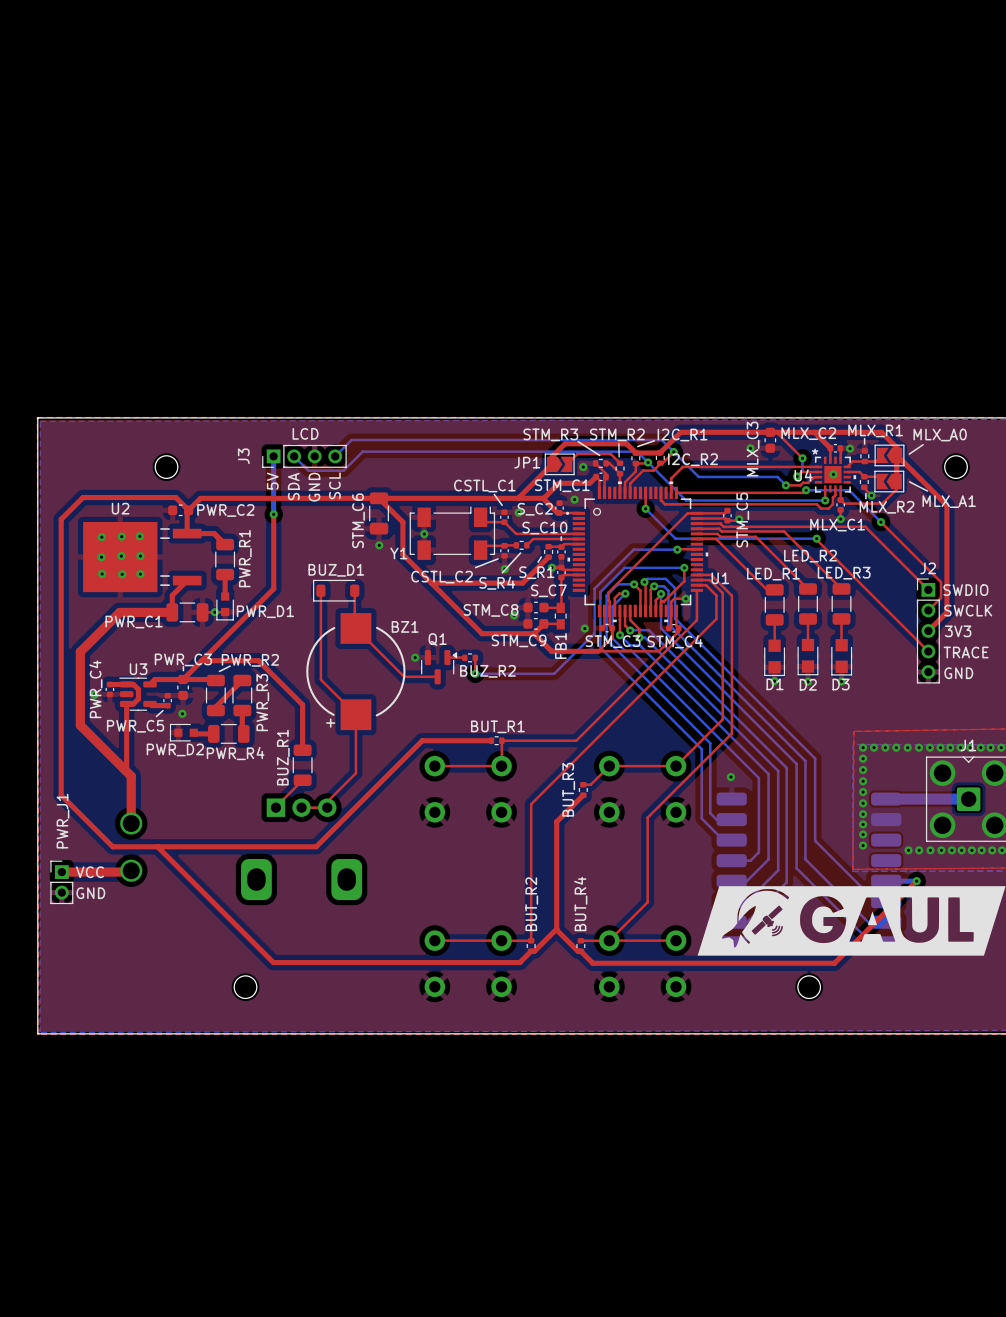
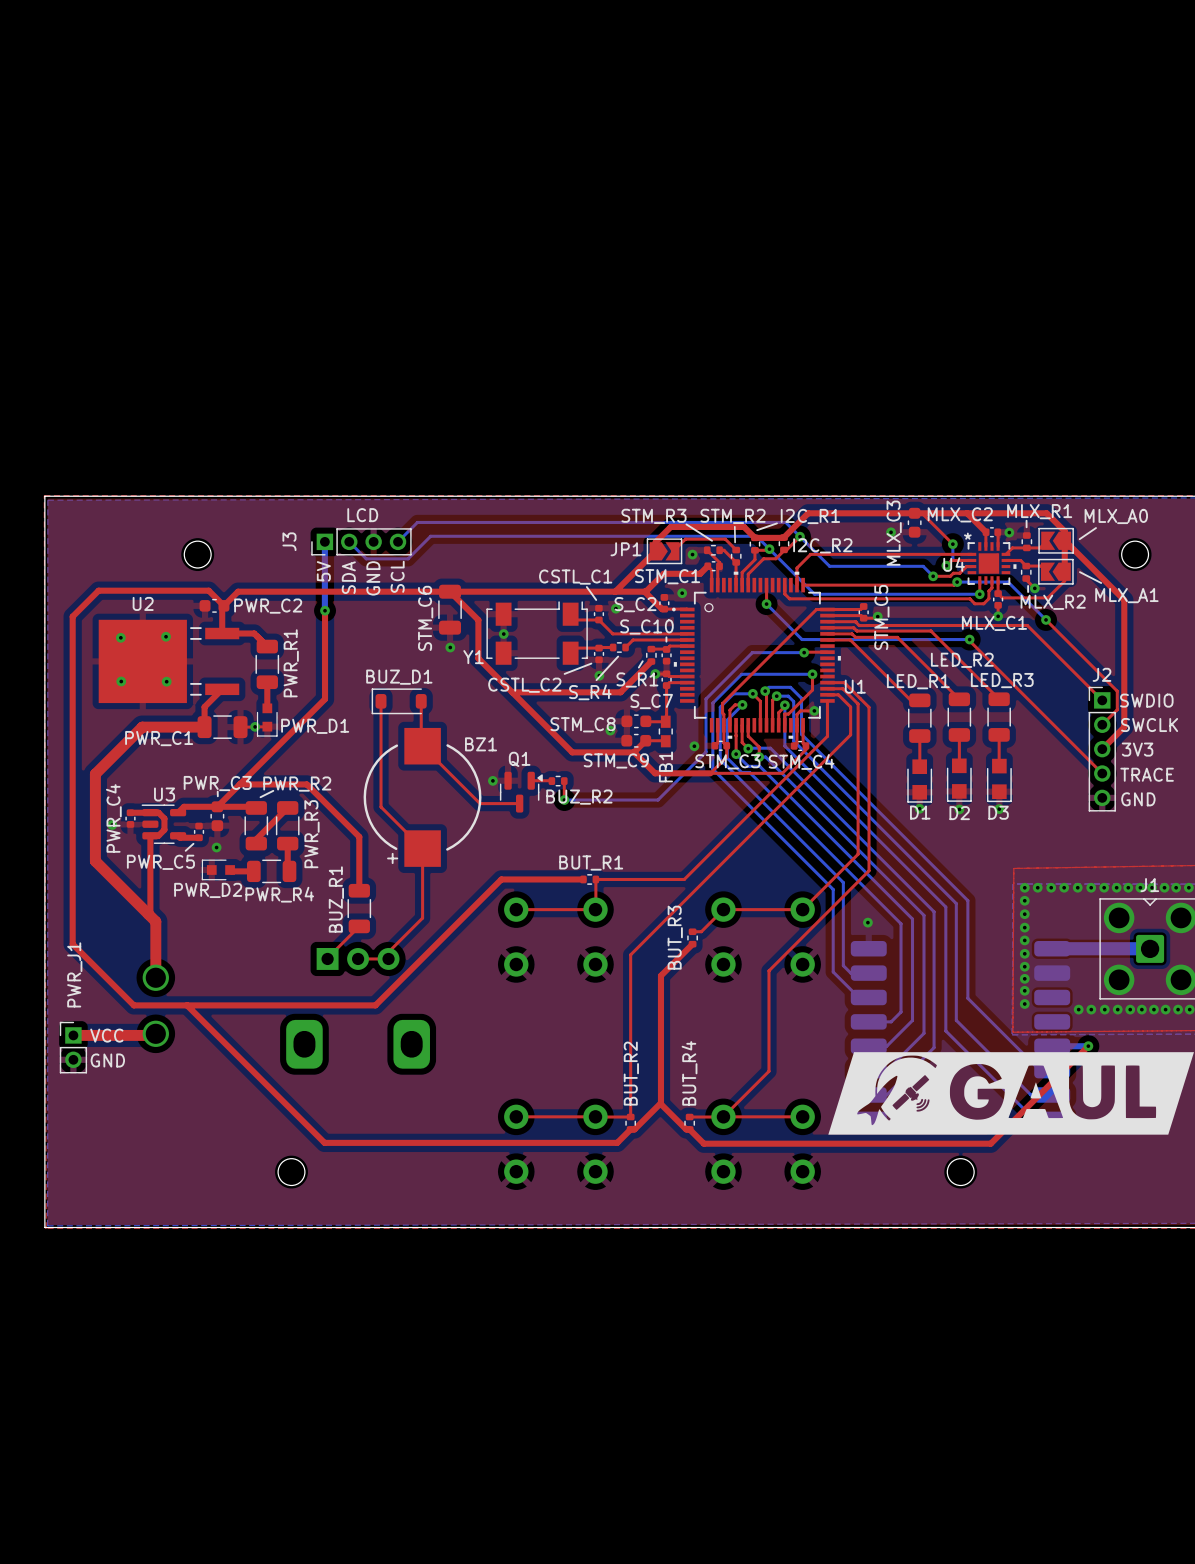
via: (833, 474) -> none
via: (121, 536) -> none
via: (121, 556) -> none
via: (140, 556) -> none
via: (101, 557) -> none
via: (122, 574) -> none

